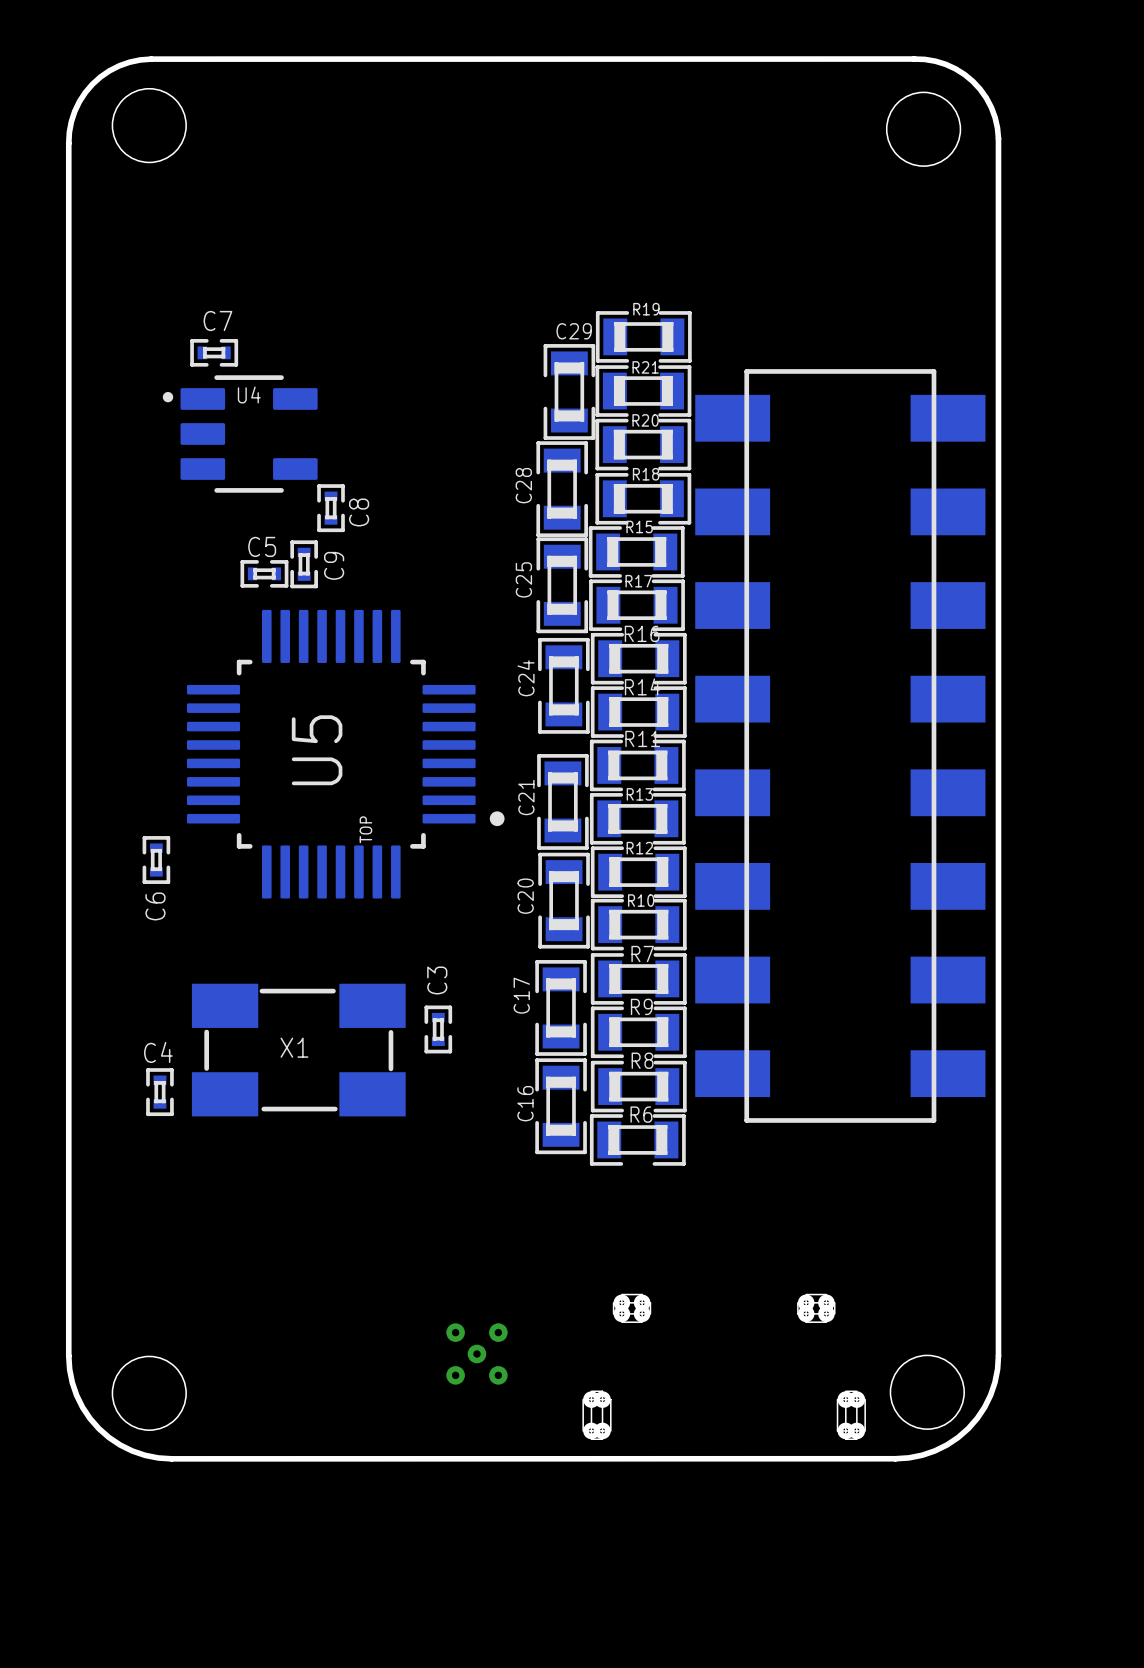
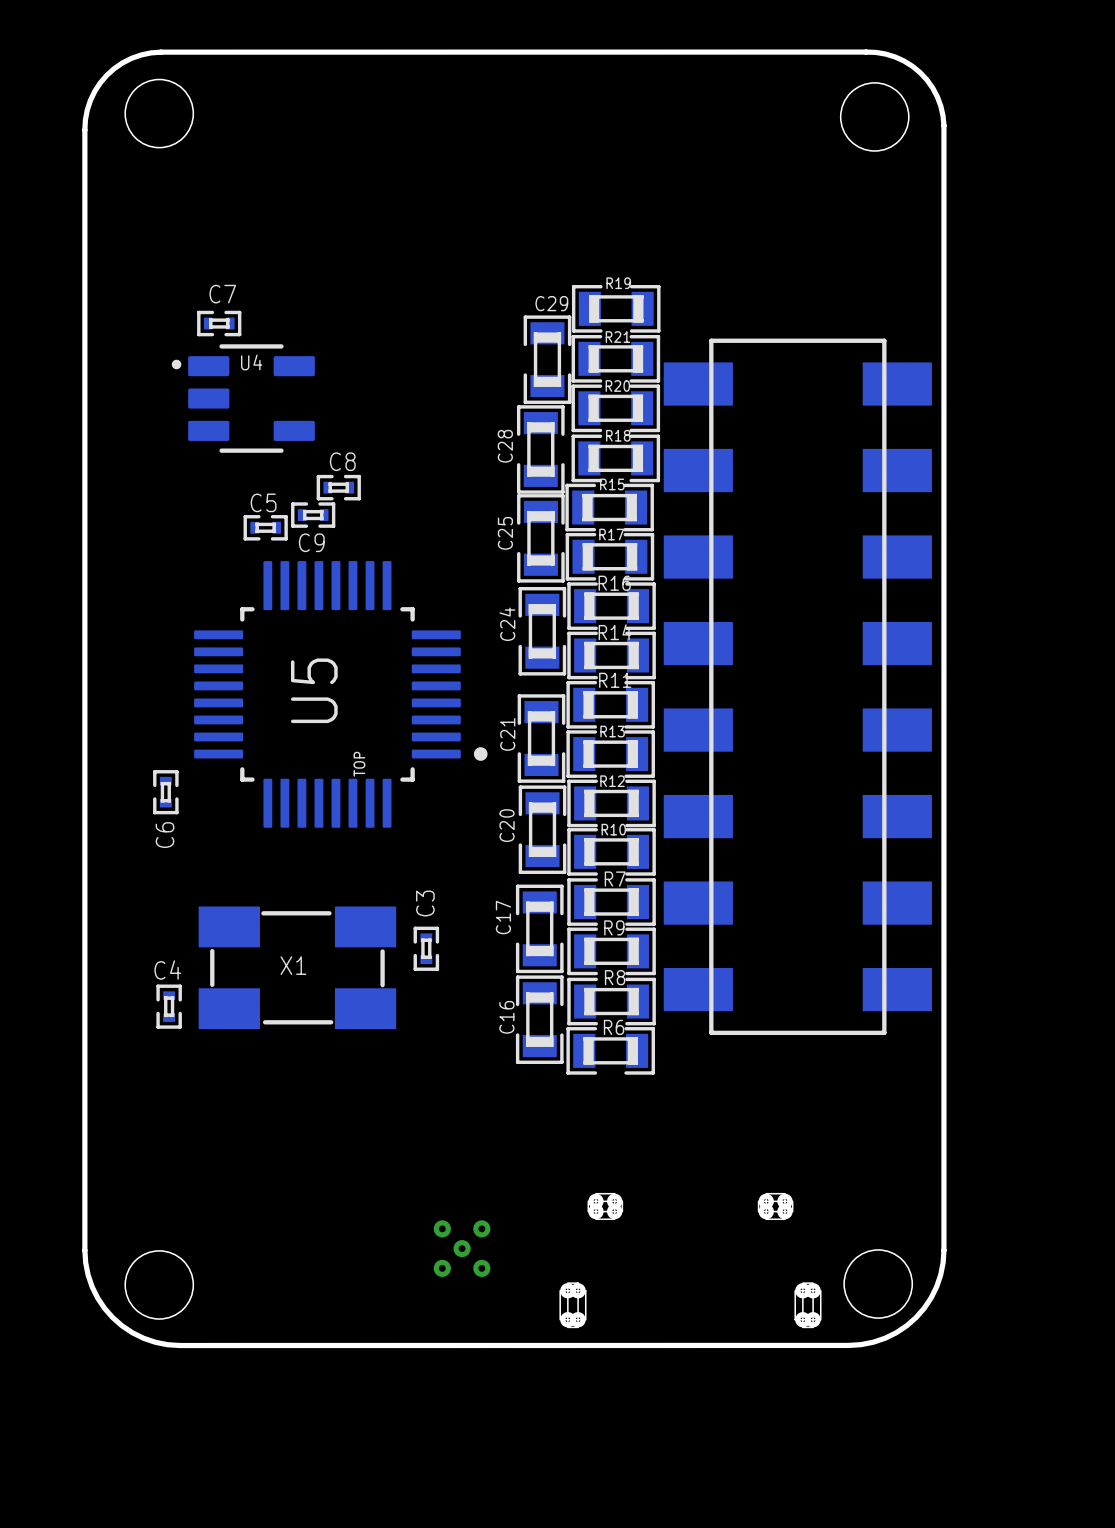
C8 rotation: 0° (331, 508) -> 90° clockwise (338, 487)
C9 rotation: 0° (304, 564) -> 90° clockwise (313, 515)

